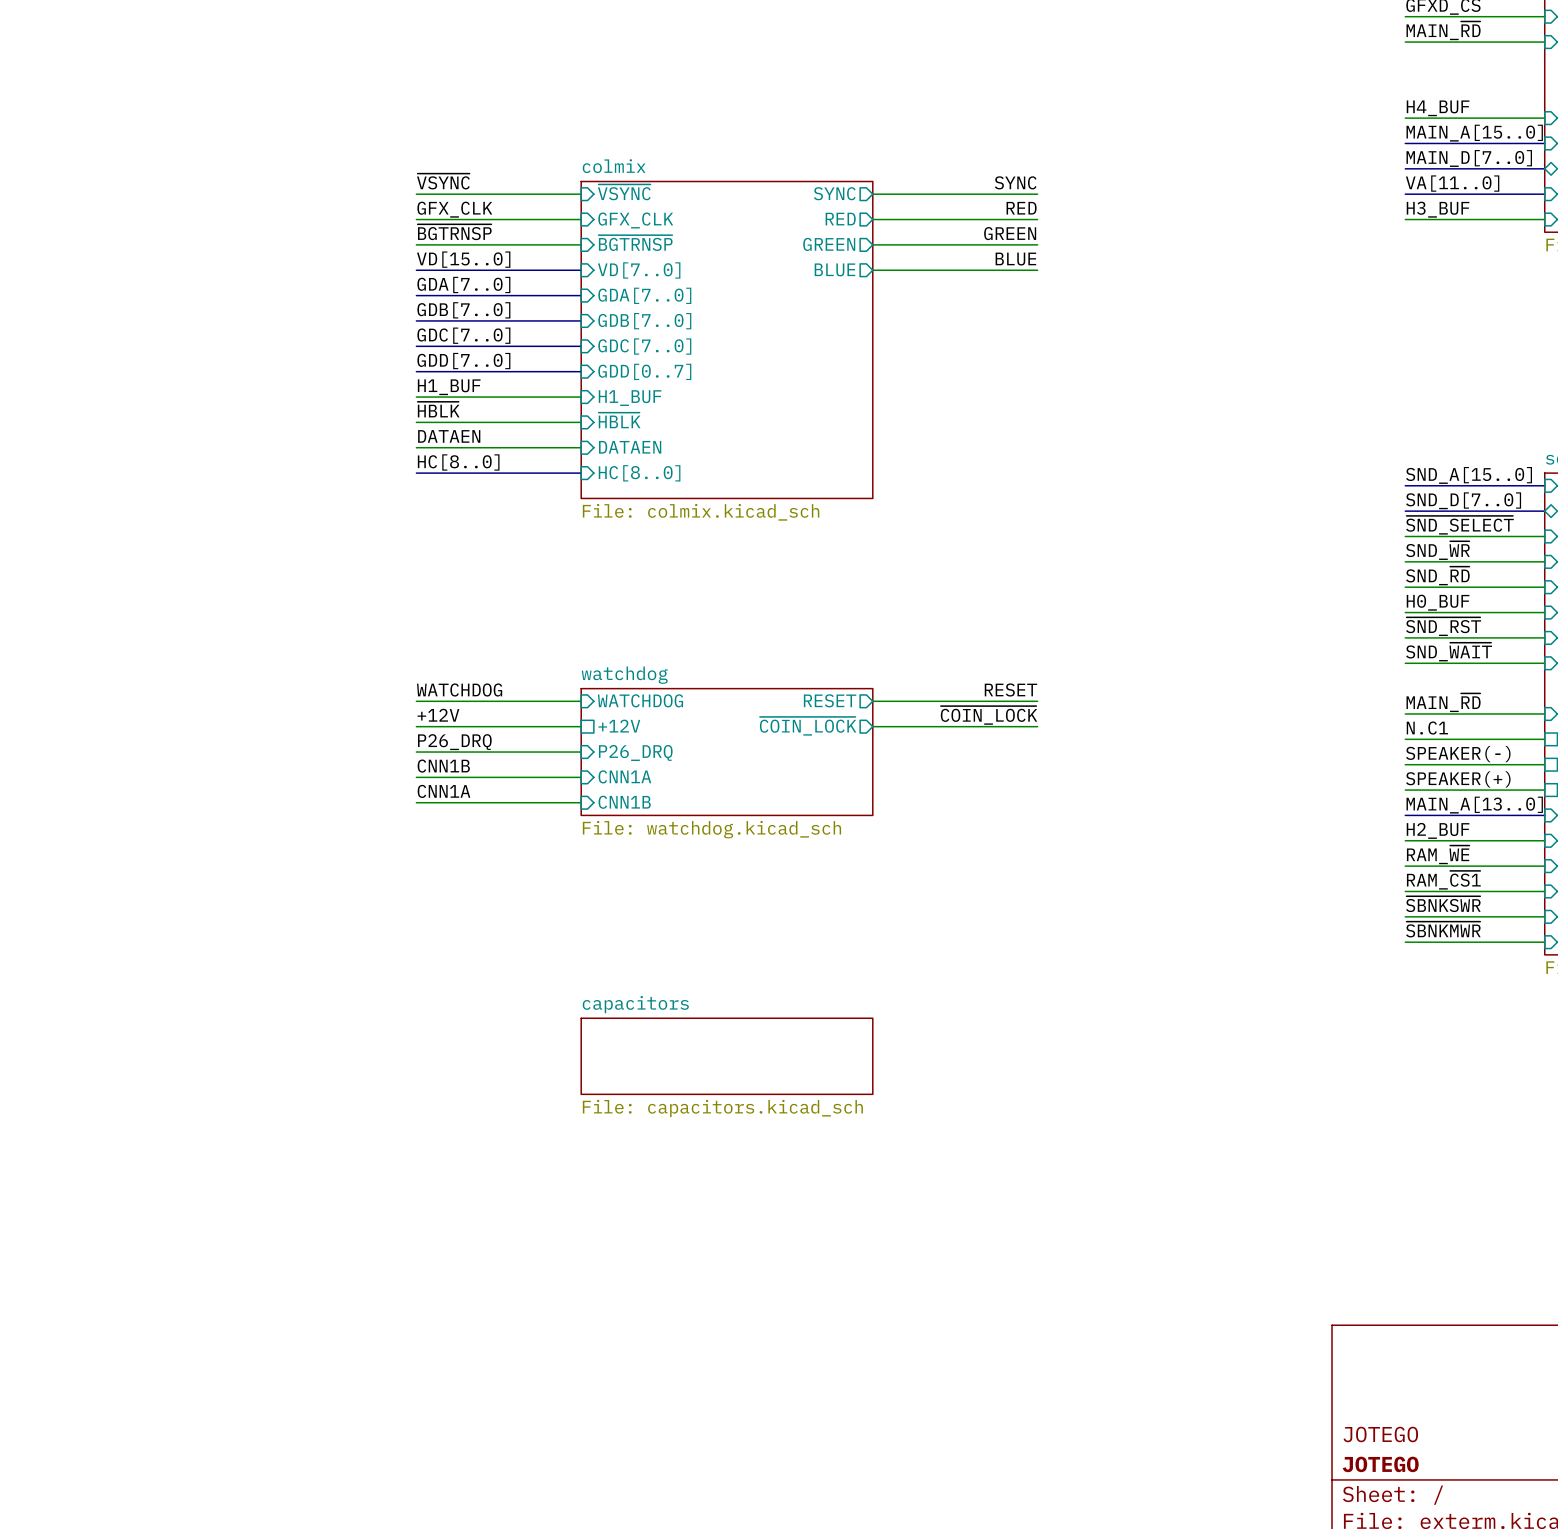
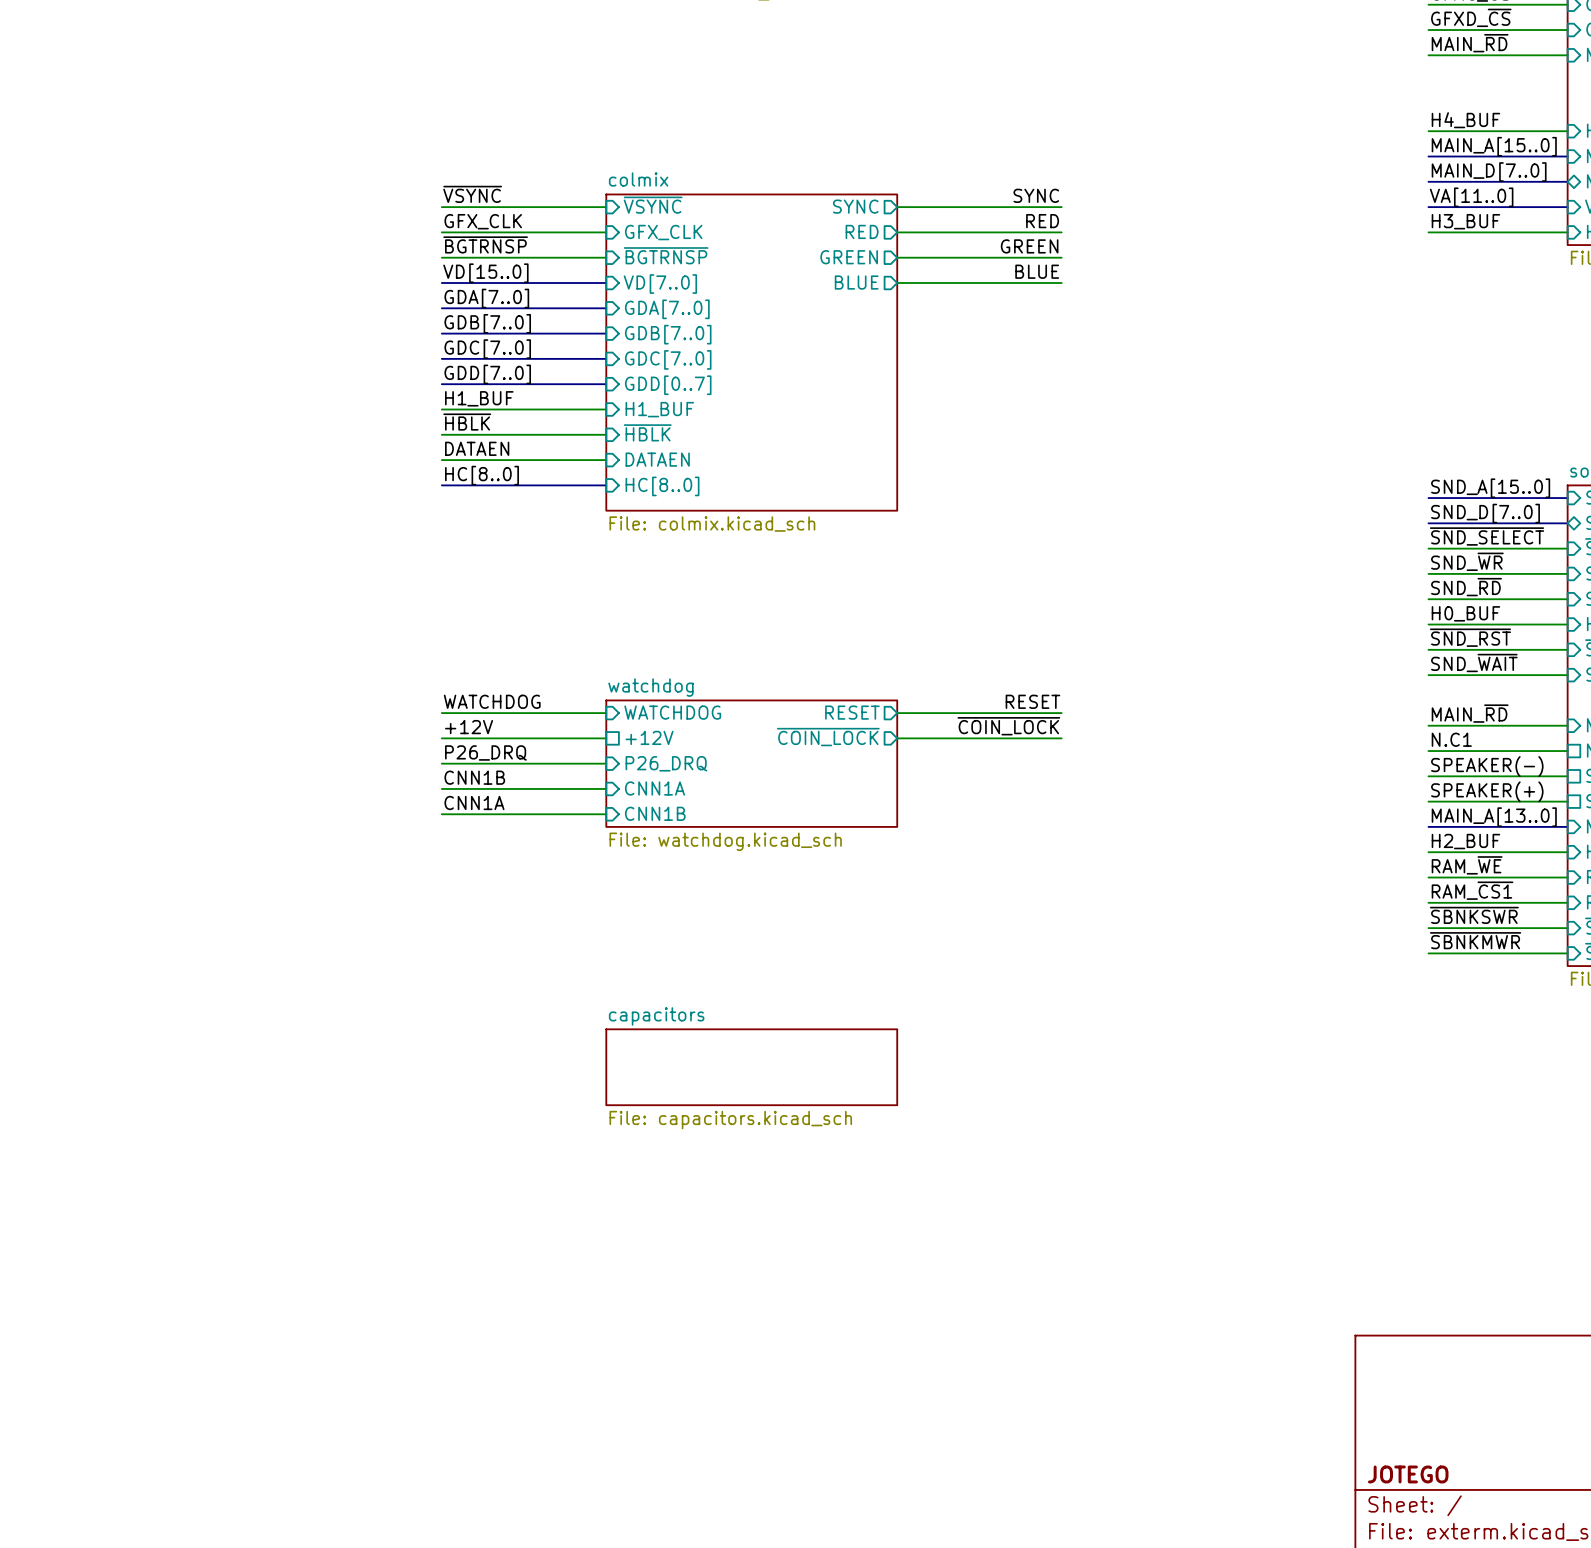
title block: JOTEGO (1380, 1434) -> none

